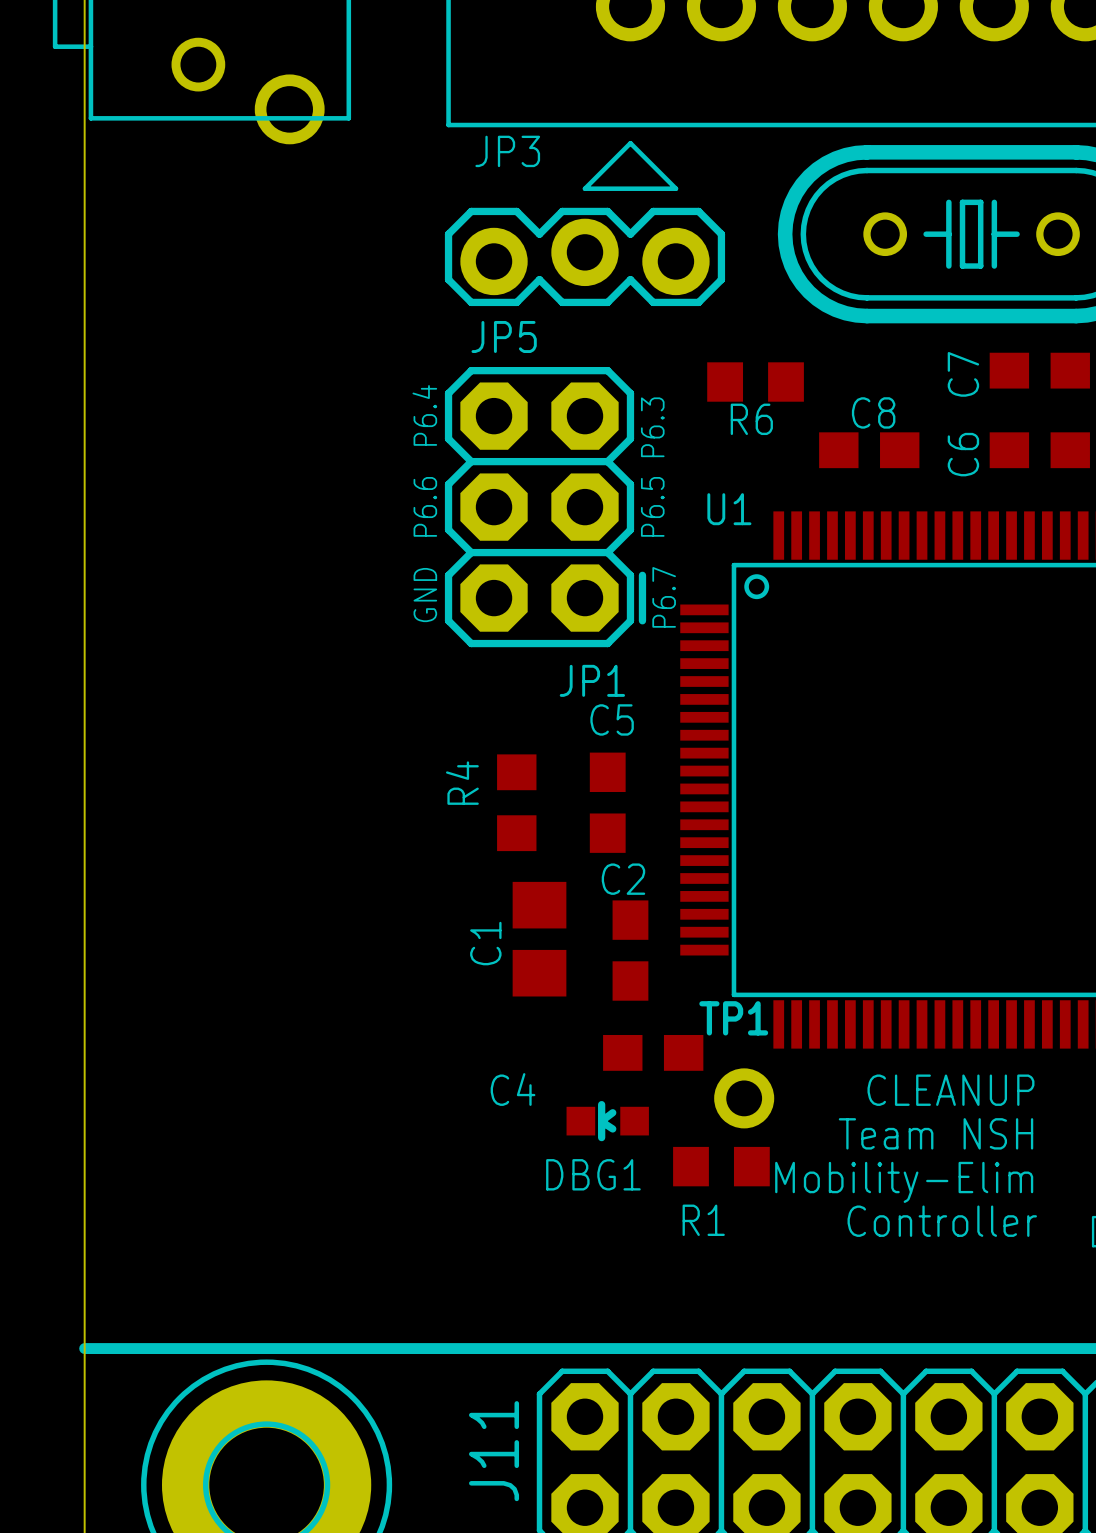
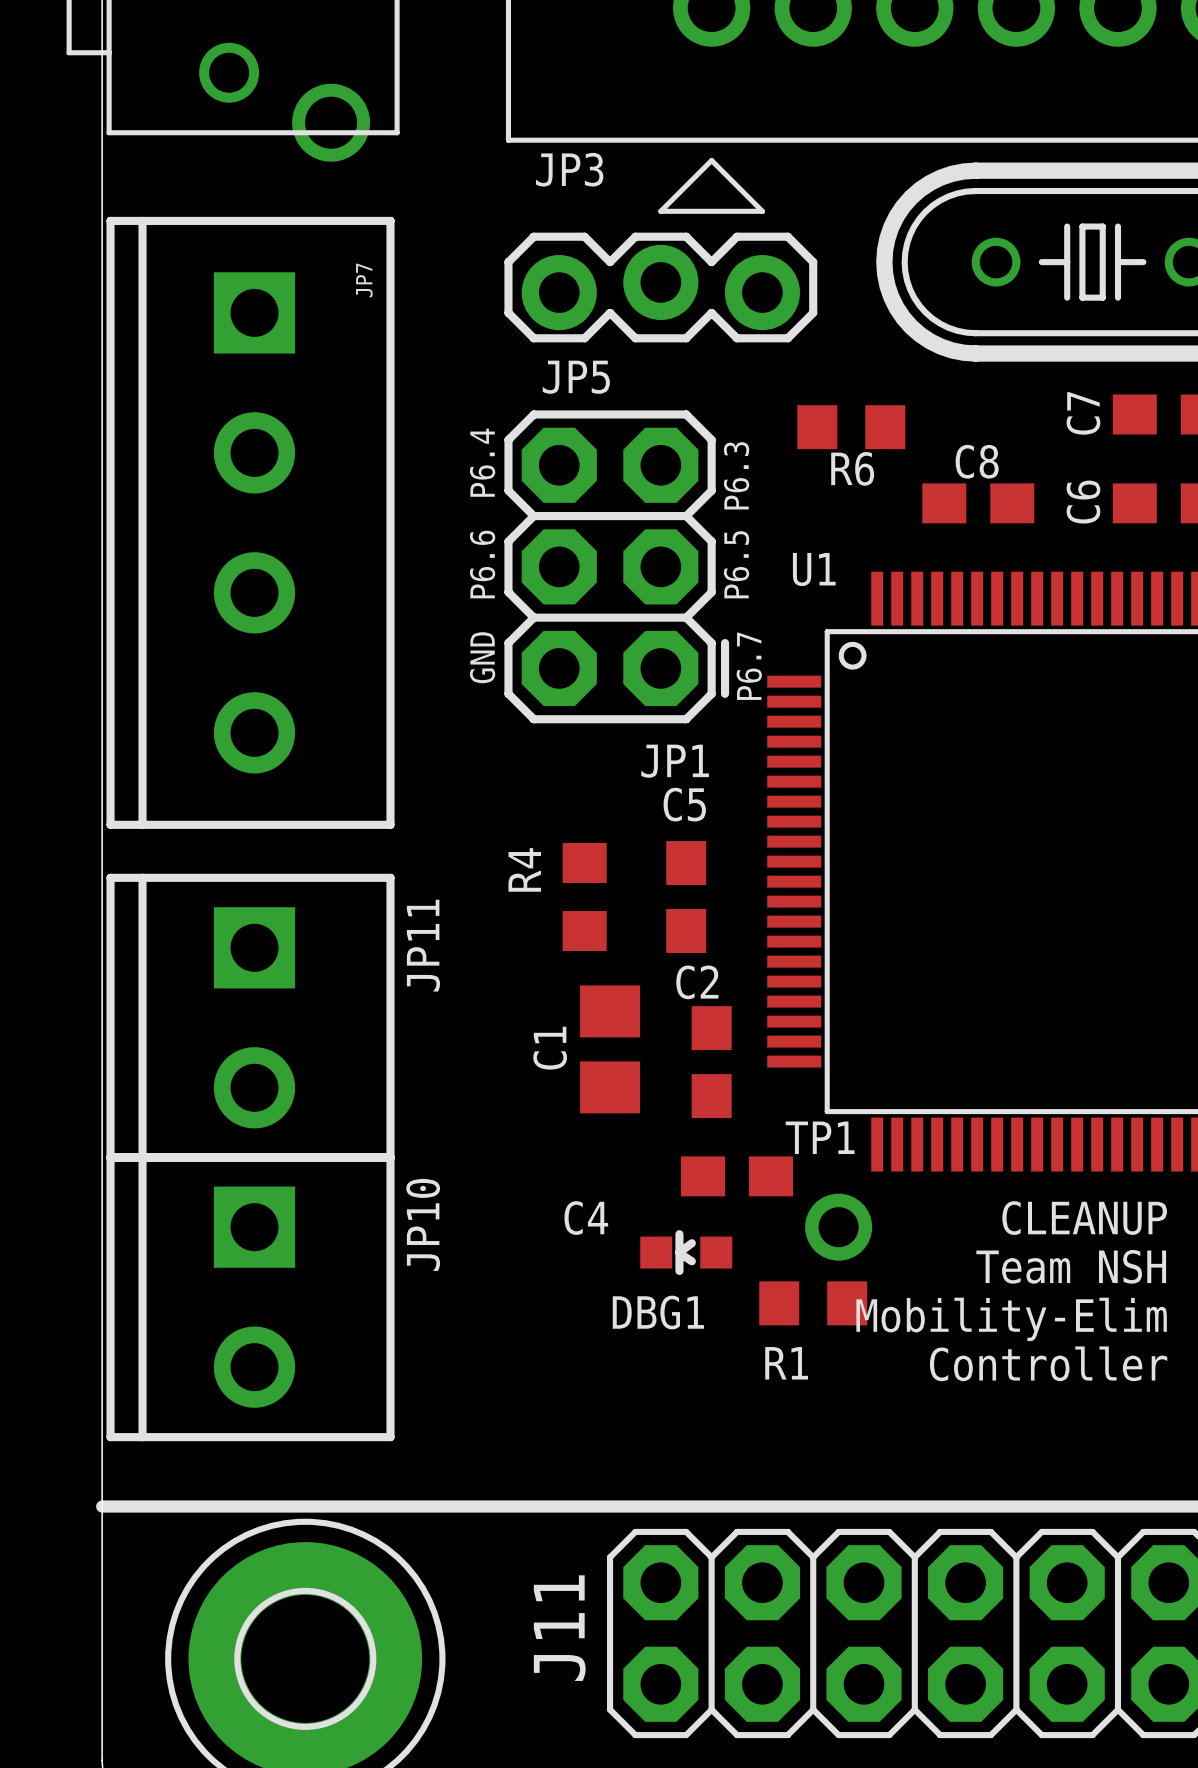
JP7: none -> (250, 522)
JP11: none -> (250, 1017)
JP10: none -> (250, 1297)

